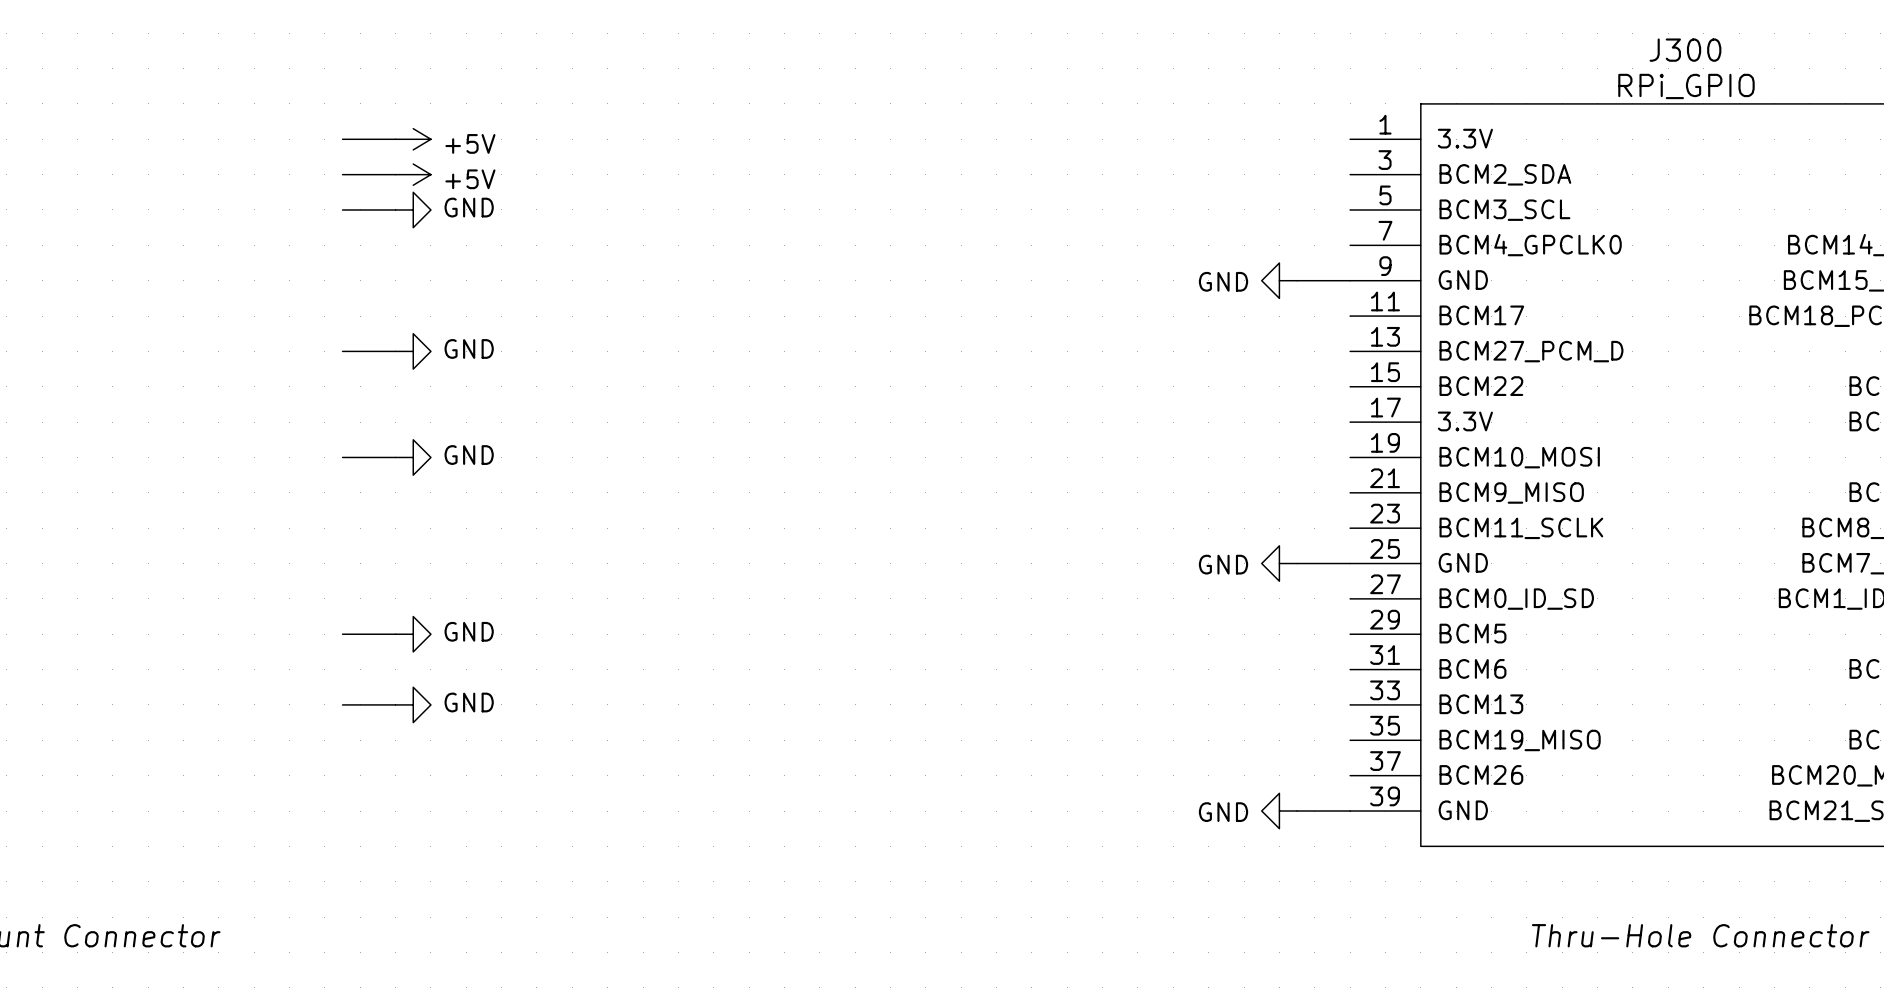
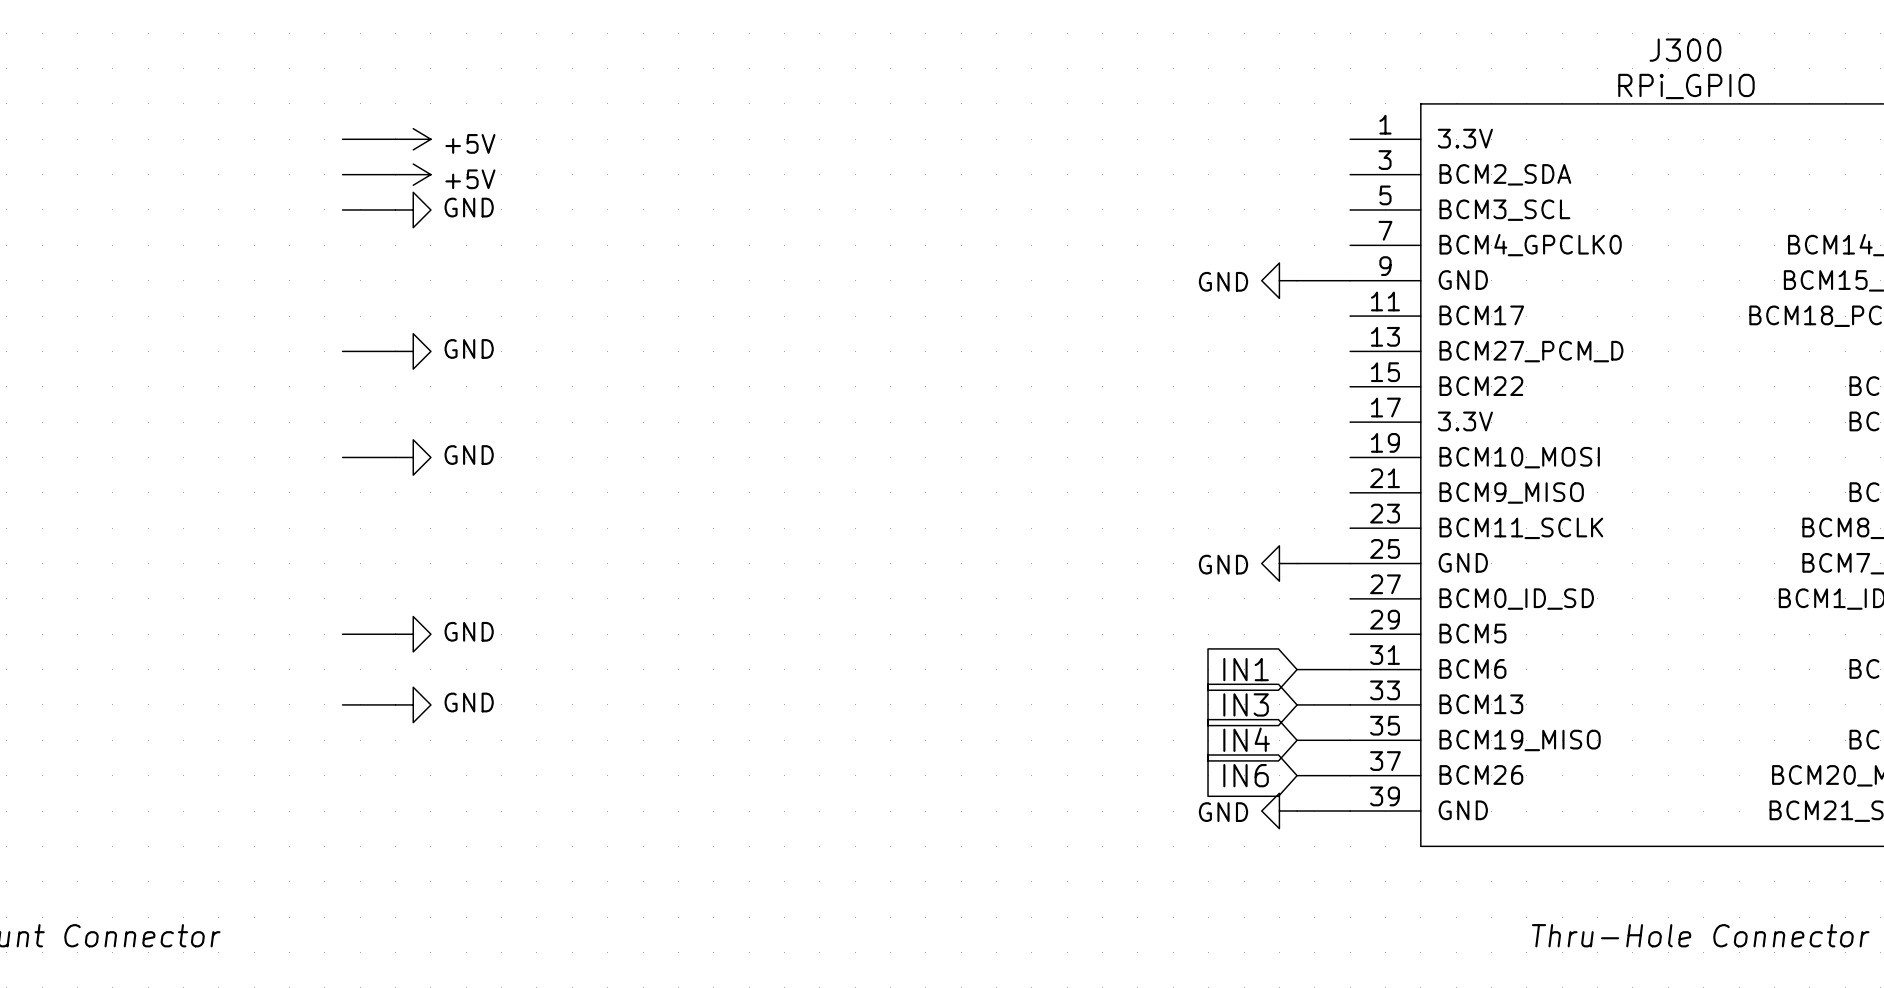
global label: none -> IN1 (1246, 669)
wire: none -> (1297, 669) (1350, 669)
global label: none -> IN3 (1246, 704)
wire: none -> (1297, 704) (1350, 704)
global label: none -> IN4 (1246, 739)
wire: none -> (1297, 740) (1350, 740)
global label: none -> IN6 (1246, 775)
wire: none -> (1297, 775) (1350, 775)

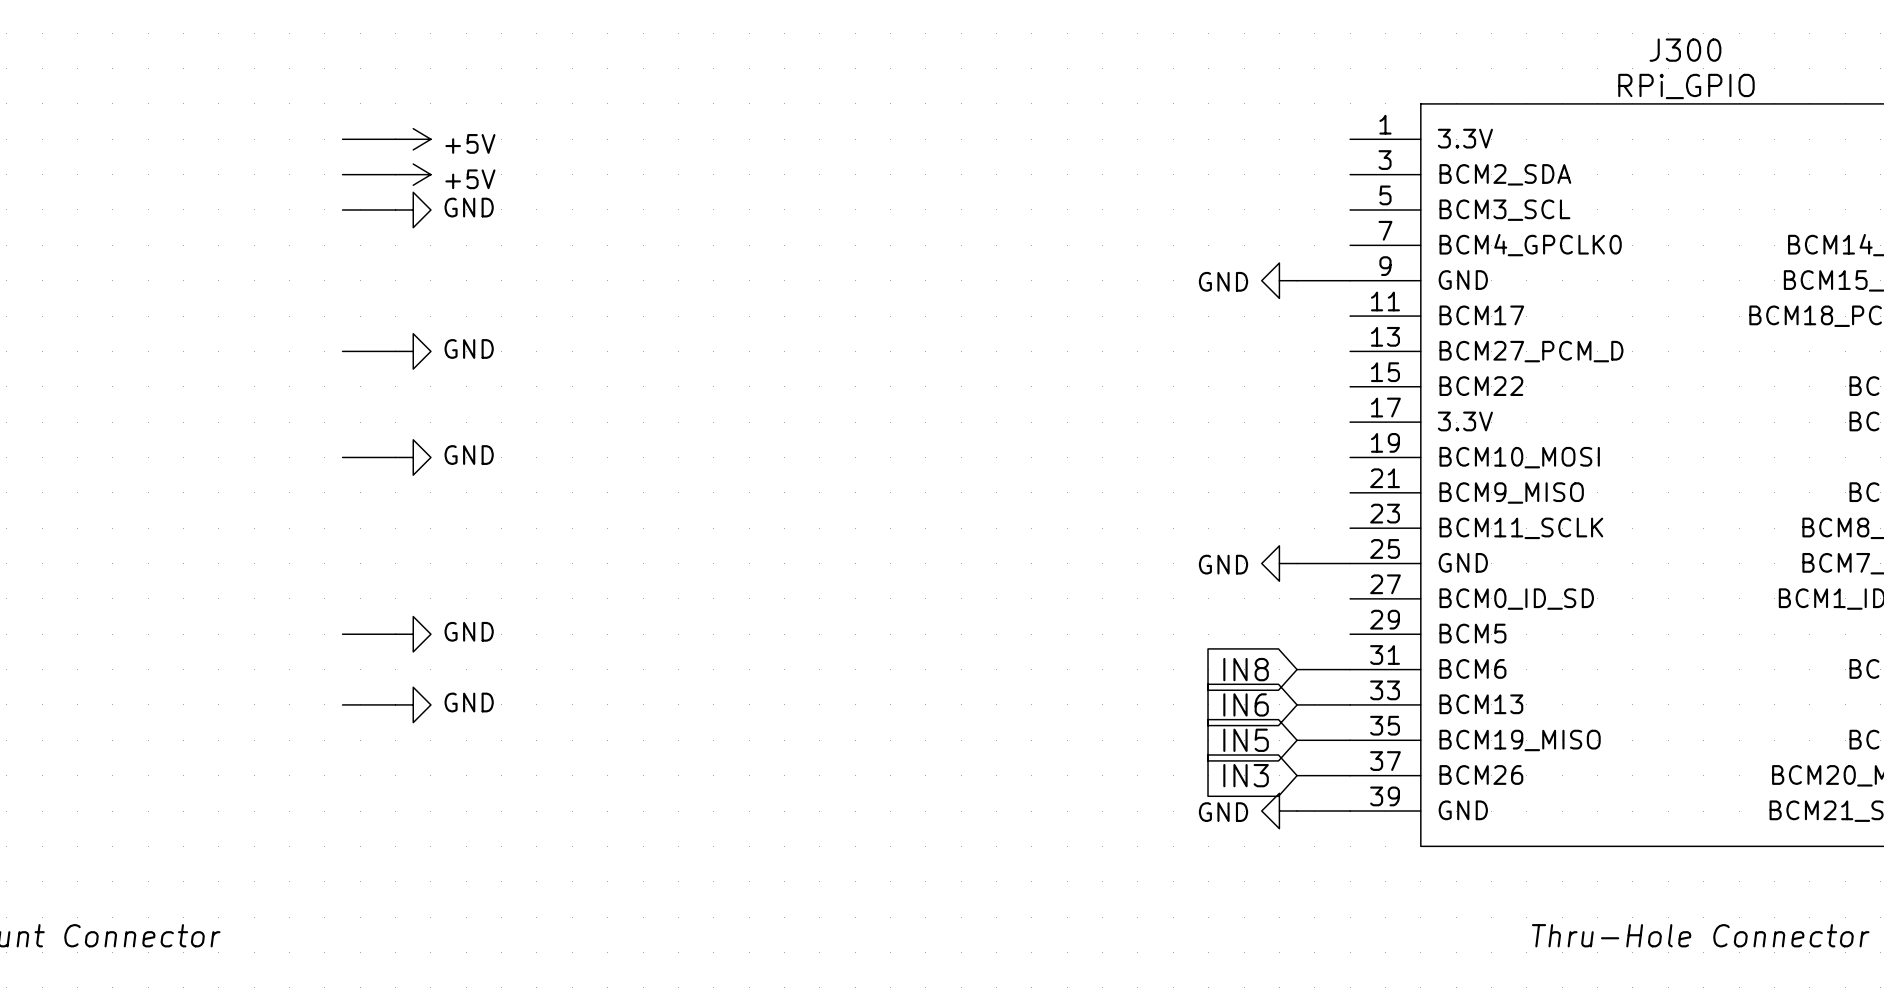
global label: IN1 (1246, 669) -> IN8 (1246, 669)
global label: IN3 (1246, 704) -> IN6 (1246, 704)
global label: IN4 (1246, 739) -> IN5 (1246, 740)
global label: IN6 (1246, 775) -> IN3 (1246, 775)

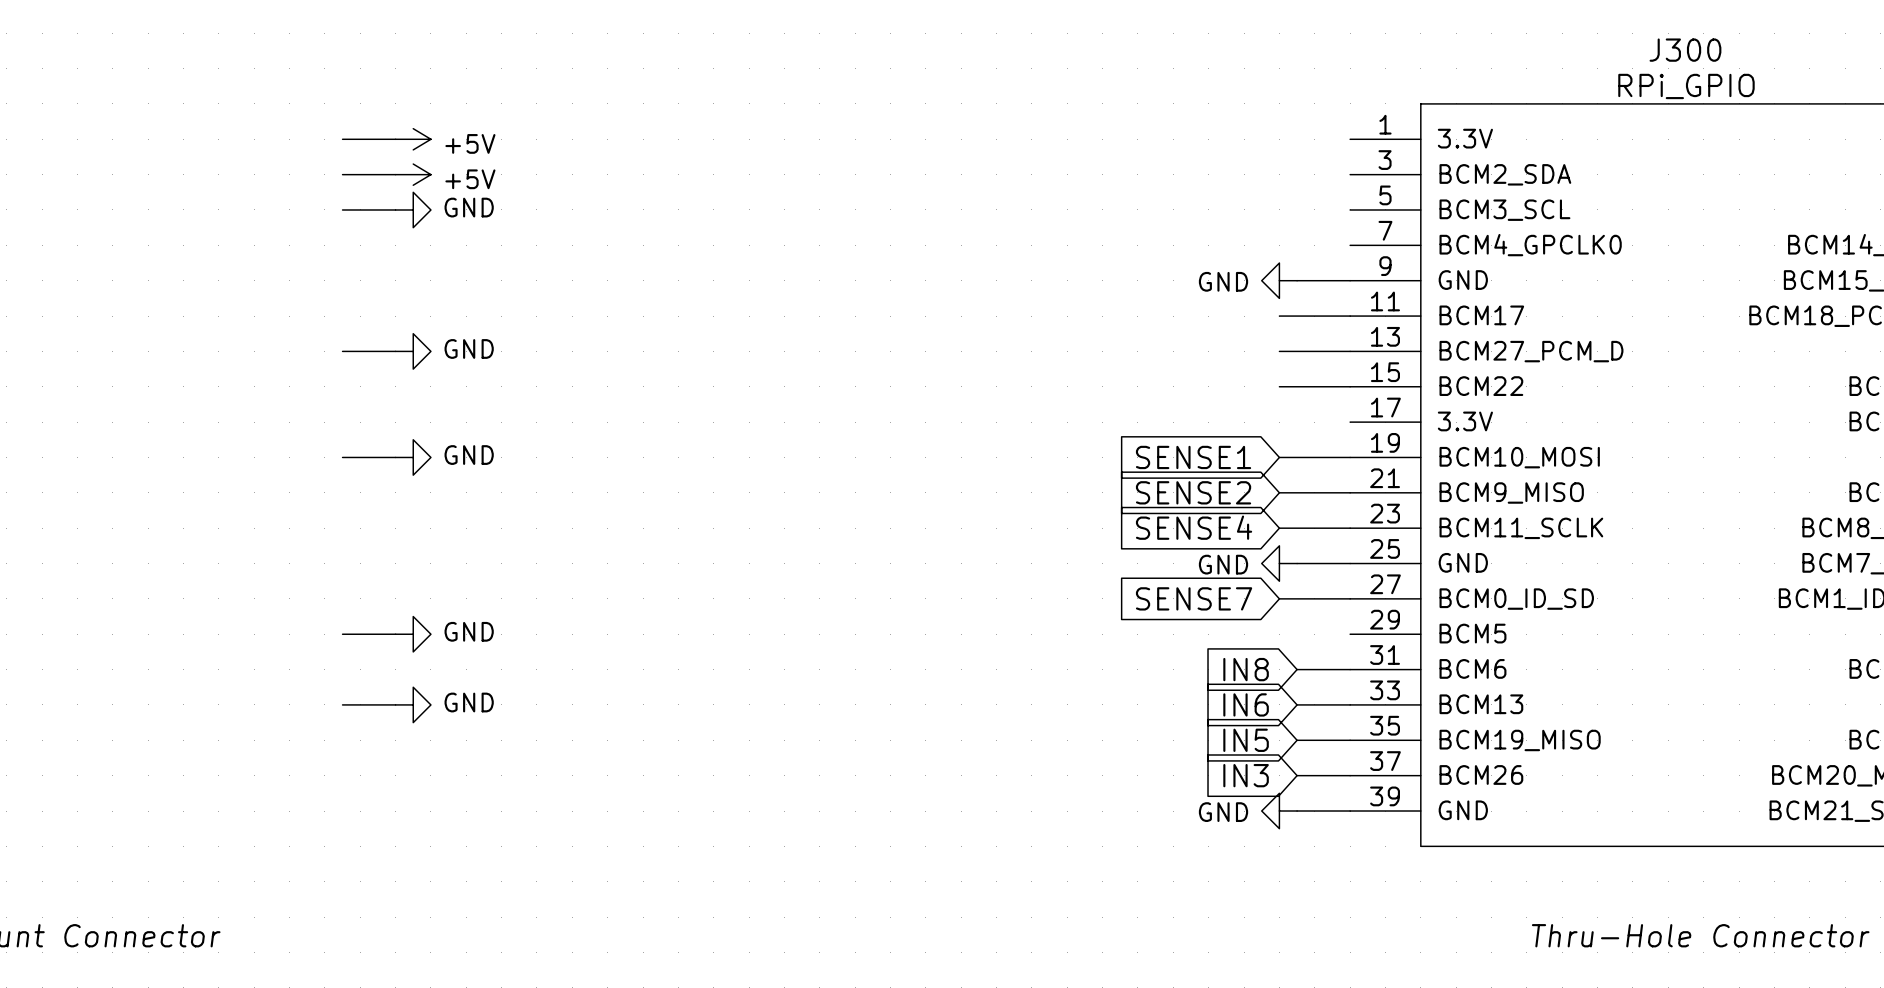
wire: none -> (1279, 316) (1350, 316)
wire: none -> (1279, 351) (1350, 351)
wire: none -> (1279, 386) (1350, 386)
global label: none -> SENSE1 (1193, 457)
wire: none -> (1279, 457) (1350, 457)
global label: none -> SENSE2 (1193, 492)
wire: none -> (1279, 492) (1350, 492)
global label: none -> SENSE4 (1194, 527)
wire: none -> (1279, 528) (1350, 528)
global label: none -> SENSE7 (1194, 598)
wire: none -> (1279, 598) (1350, 598)

